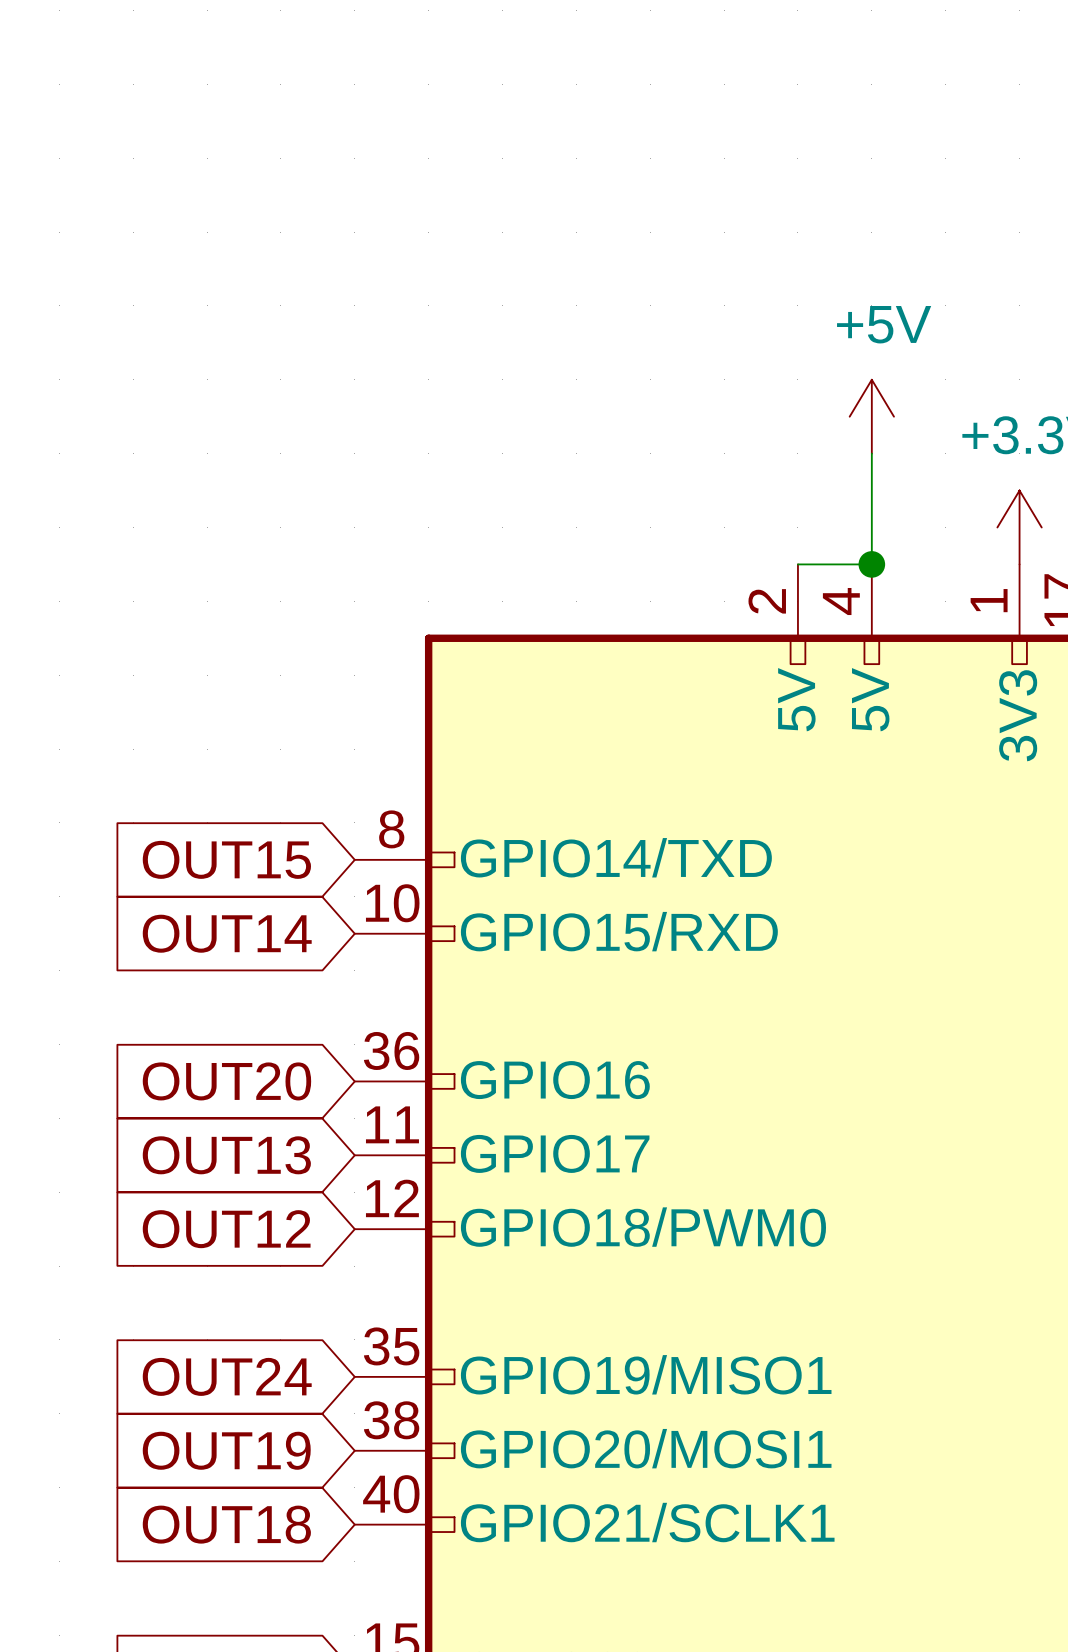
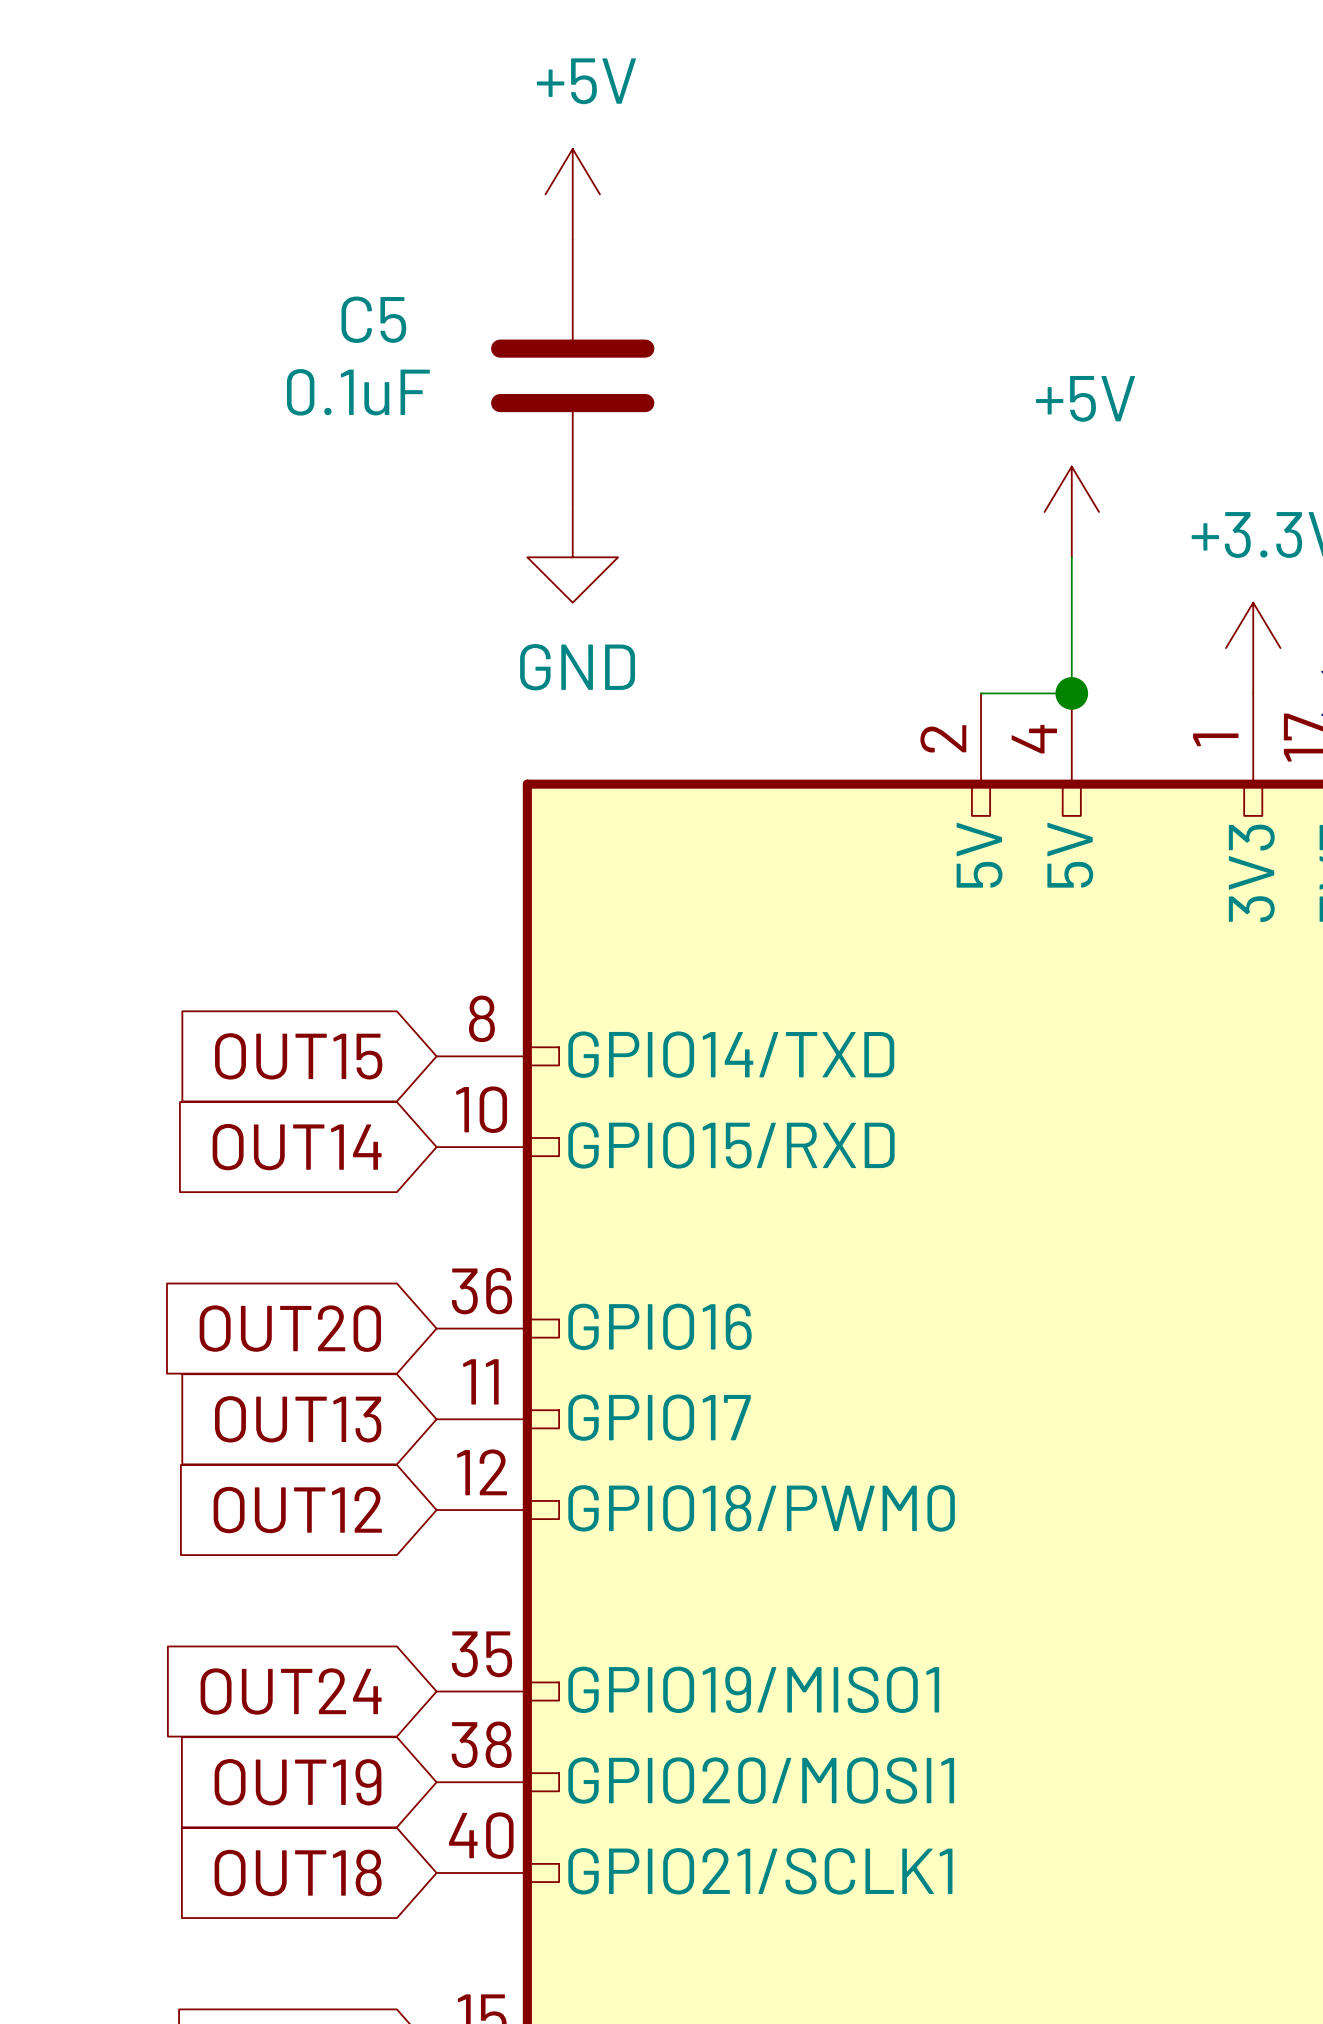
power symbol: none -> +5V (572, 194)
C5: none -> 0.1uF (572, 375)
power symbol: none -> GND (572, 557)

